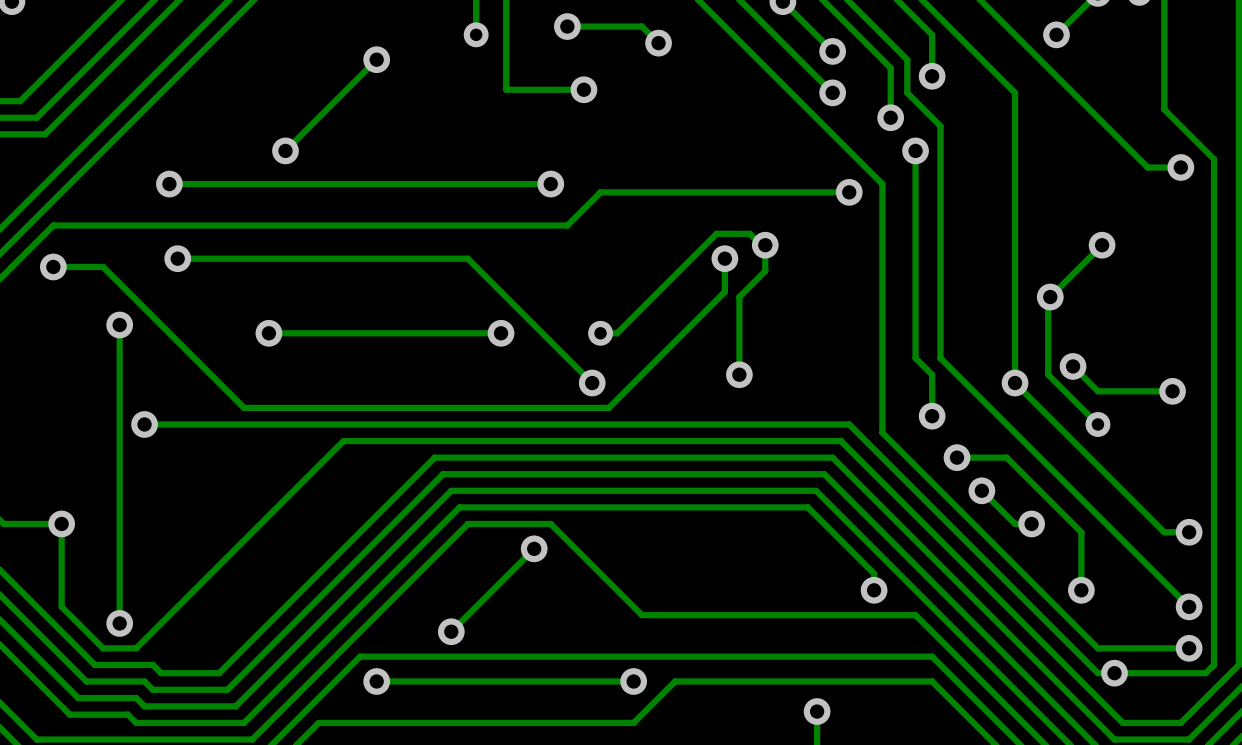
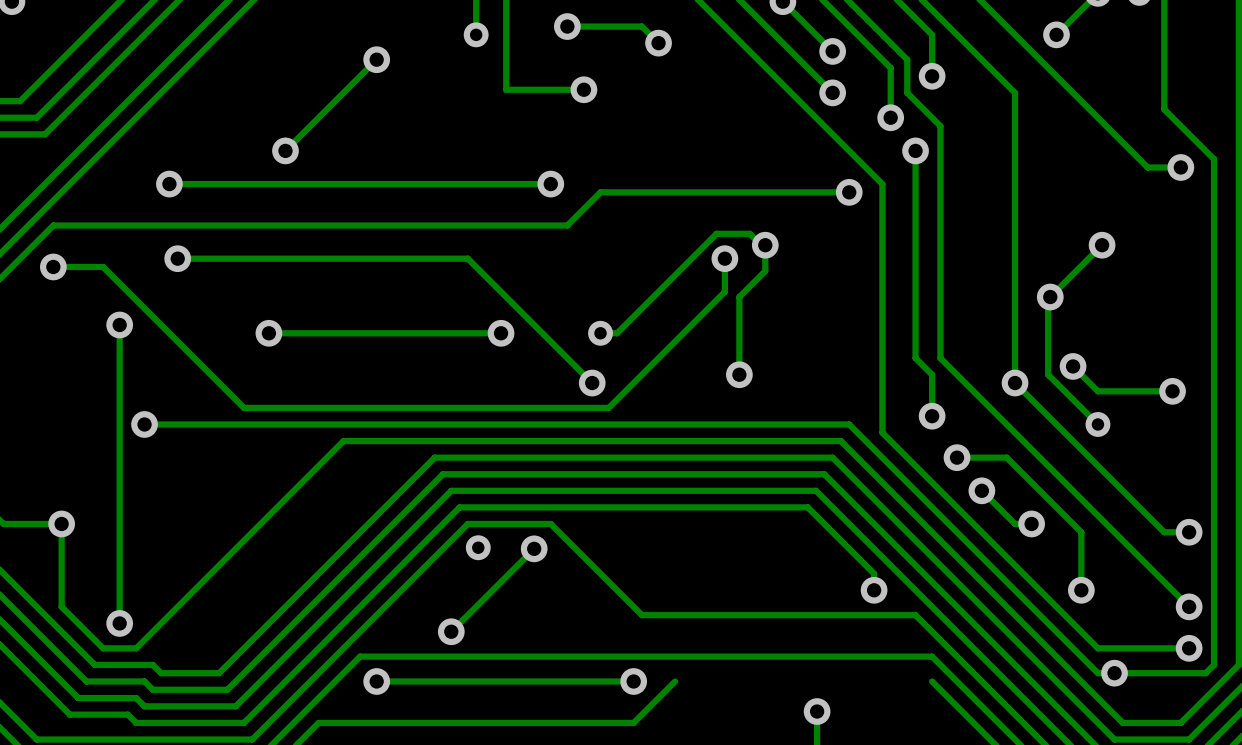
via: none -> (478, 547)
track: (932, 681) (675, 681) -> none

